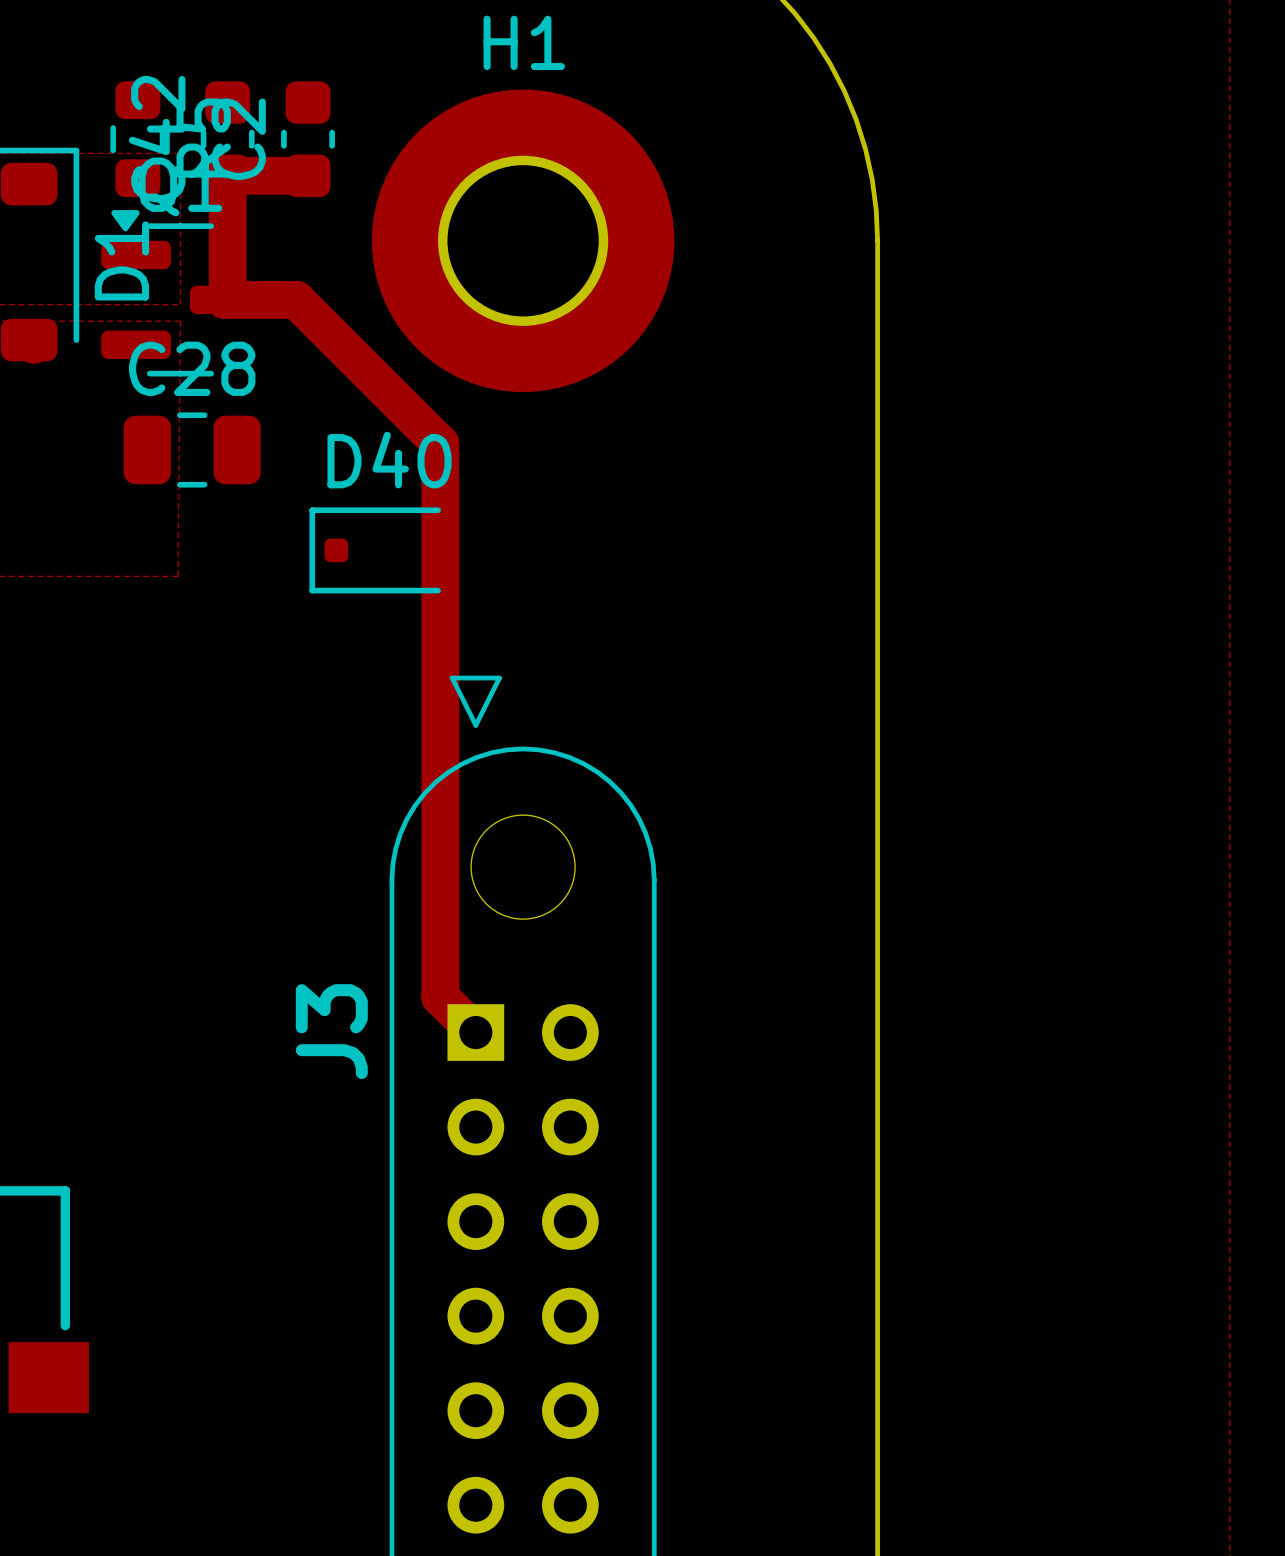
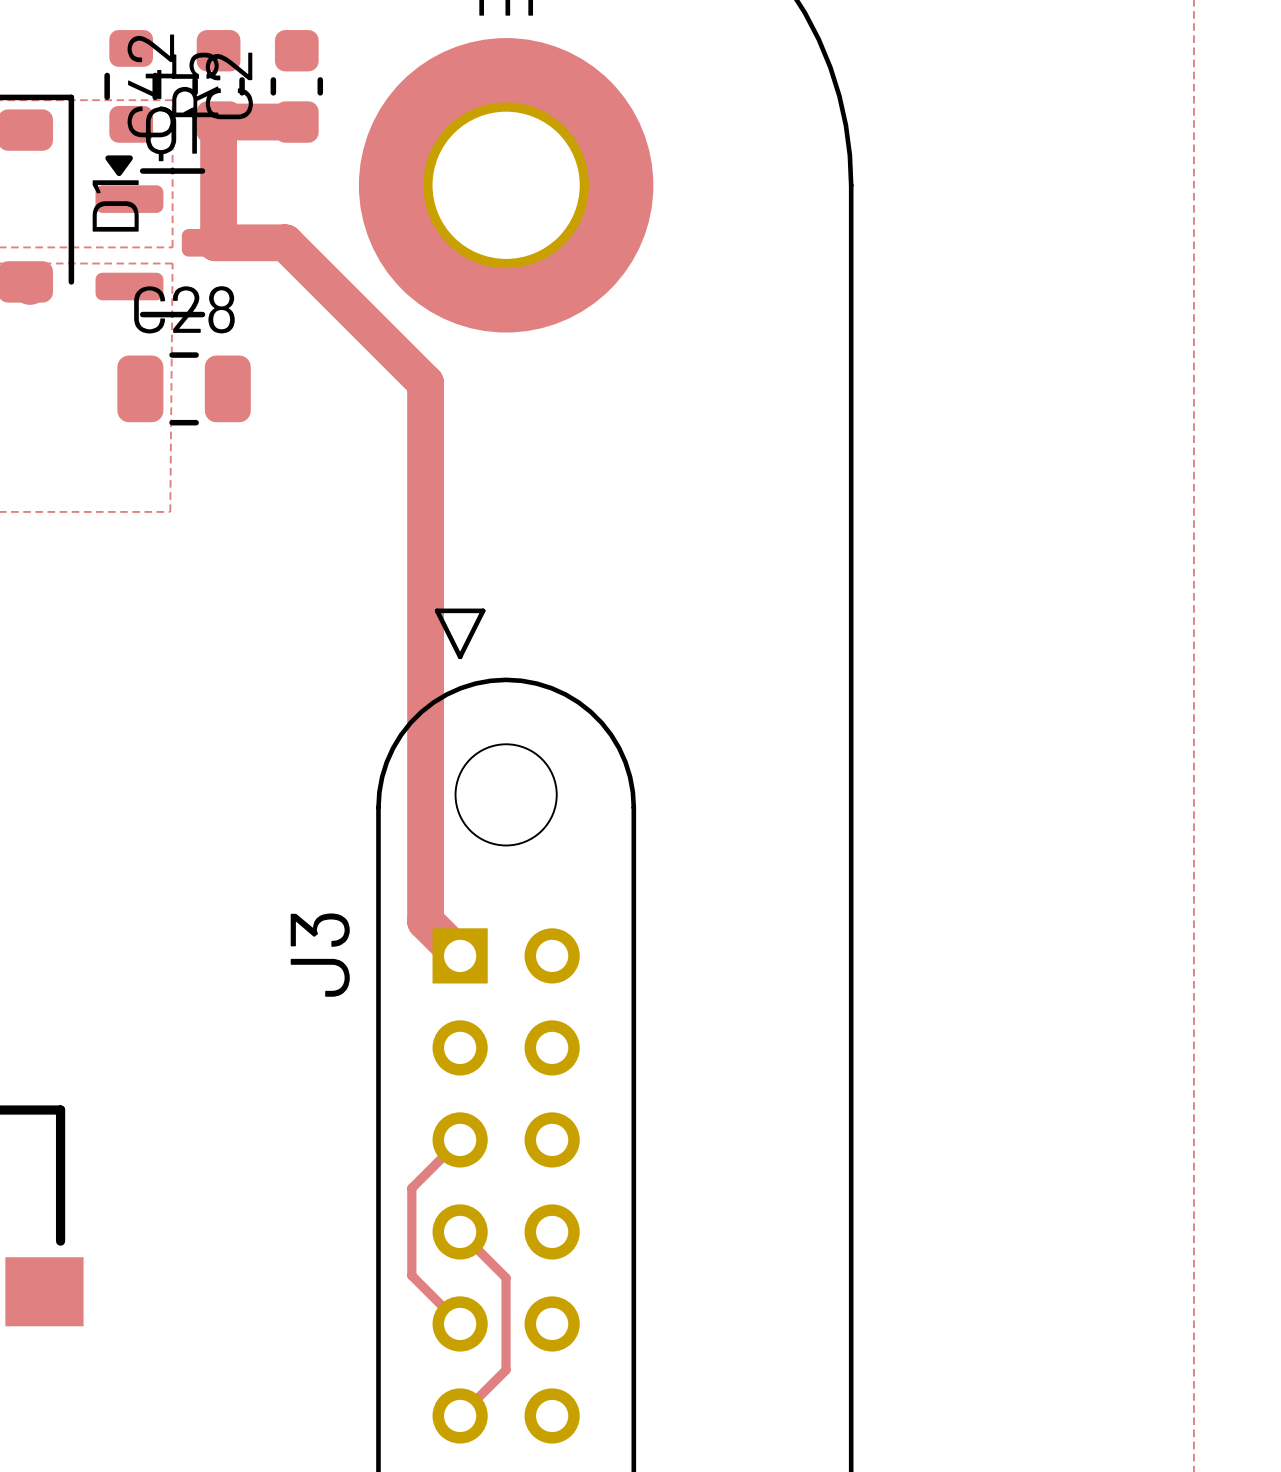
D40: (380, 550) -> none
track: none -> (460, 1139) (411, 1188) (411, 1275) (460, 1323)
track: none -> (460, 1231) (506, 1277) (506, 1370) (460, 1415)

